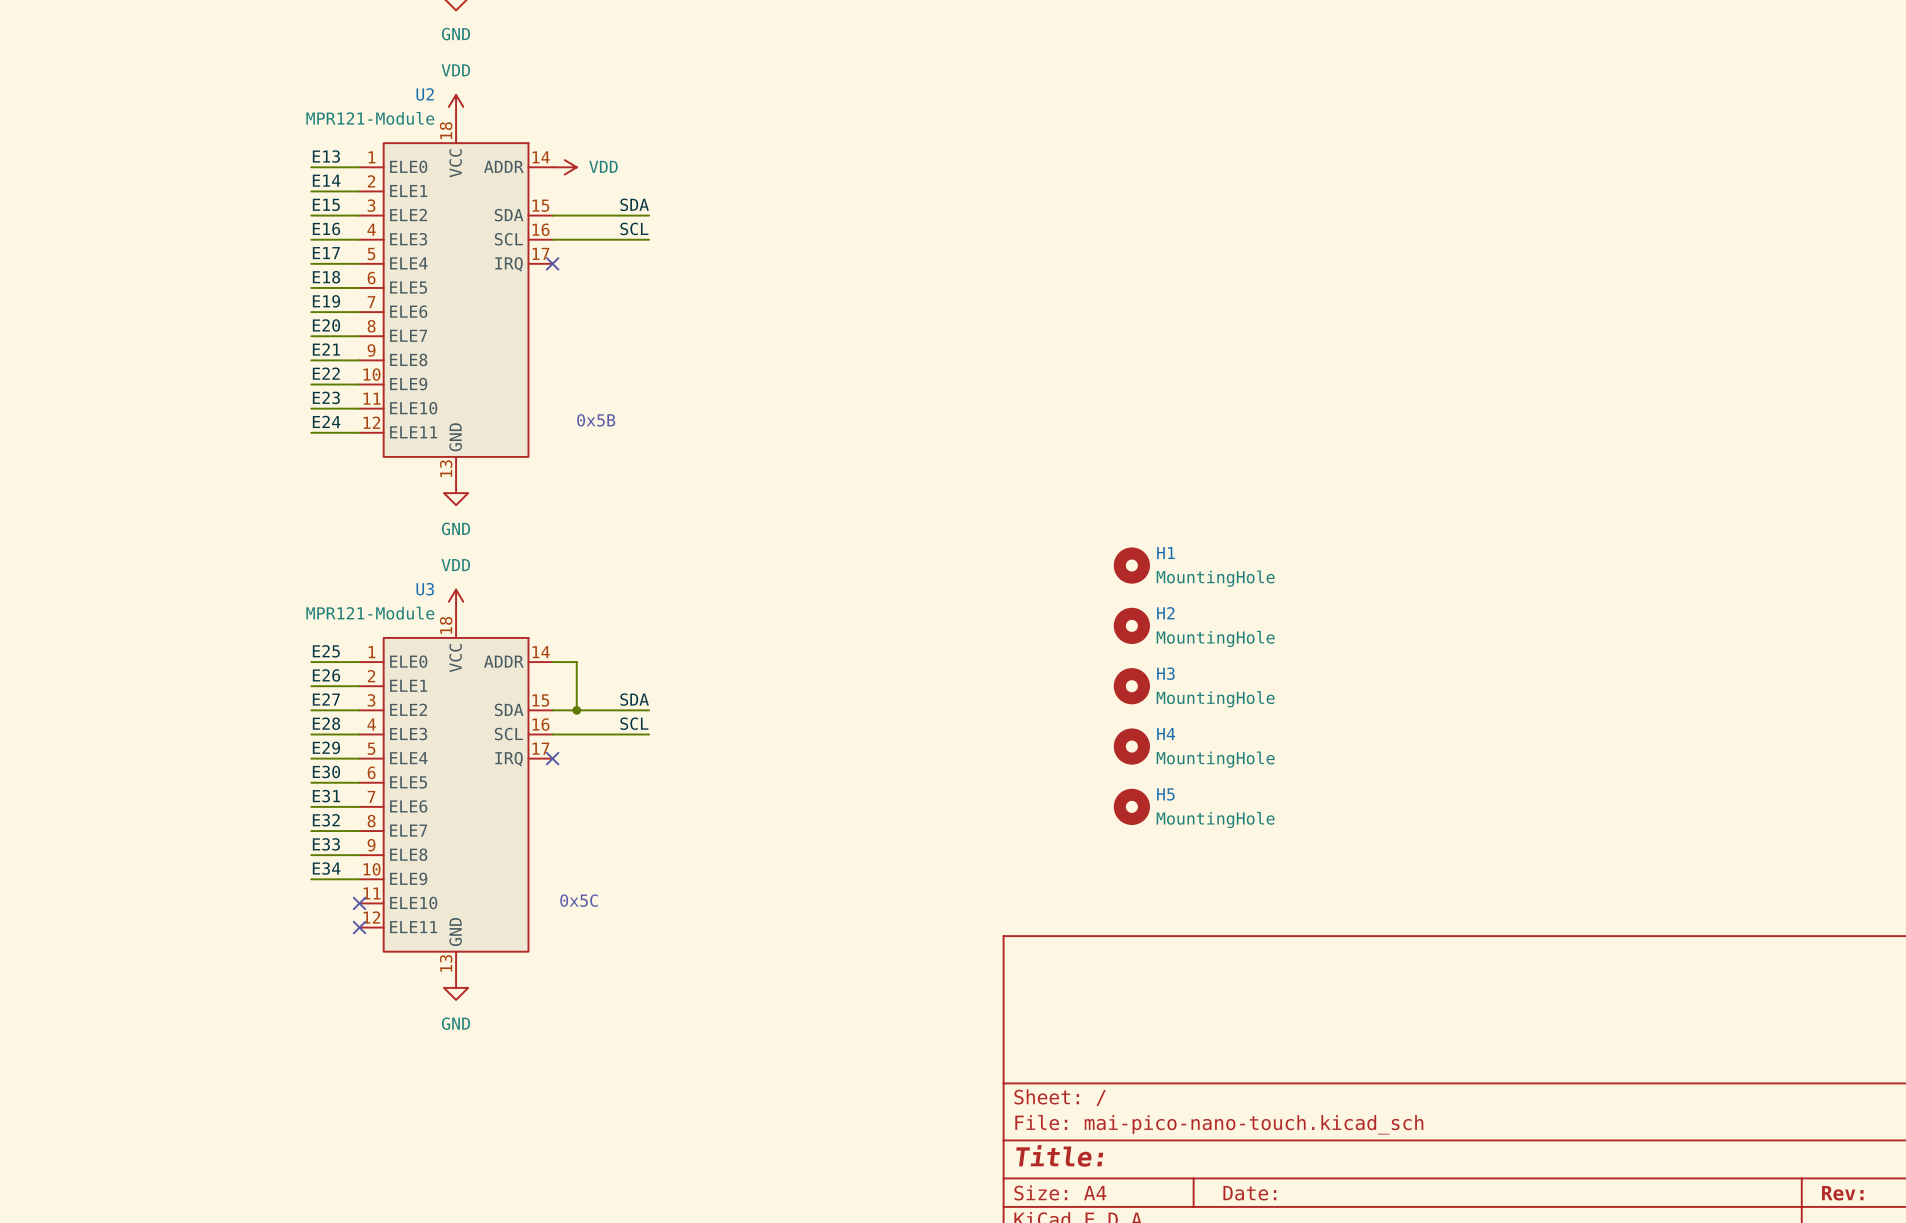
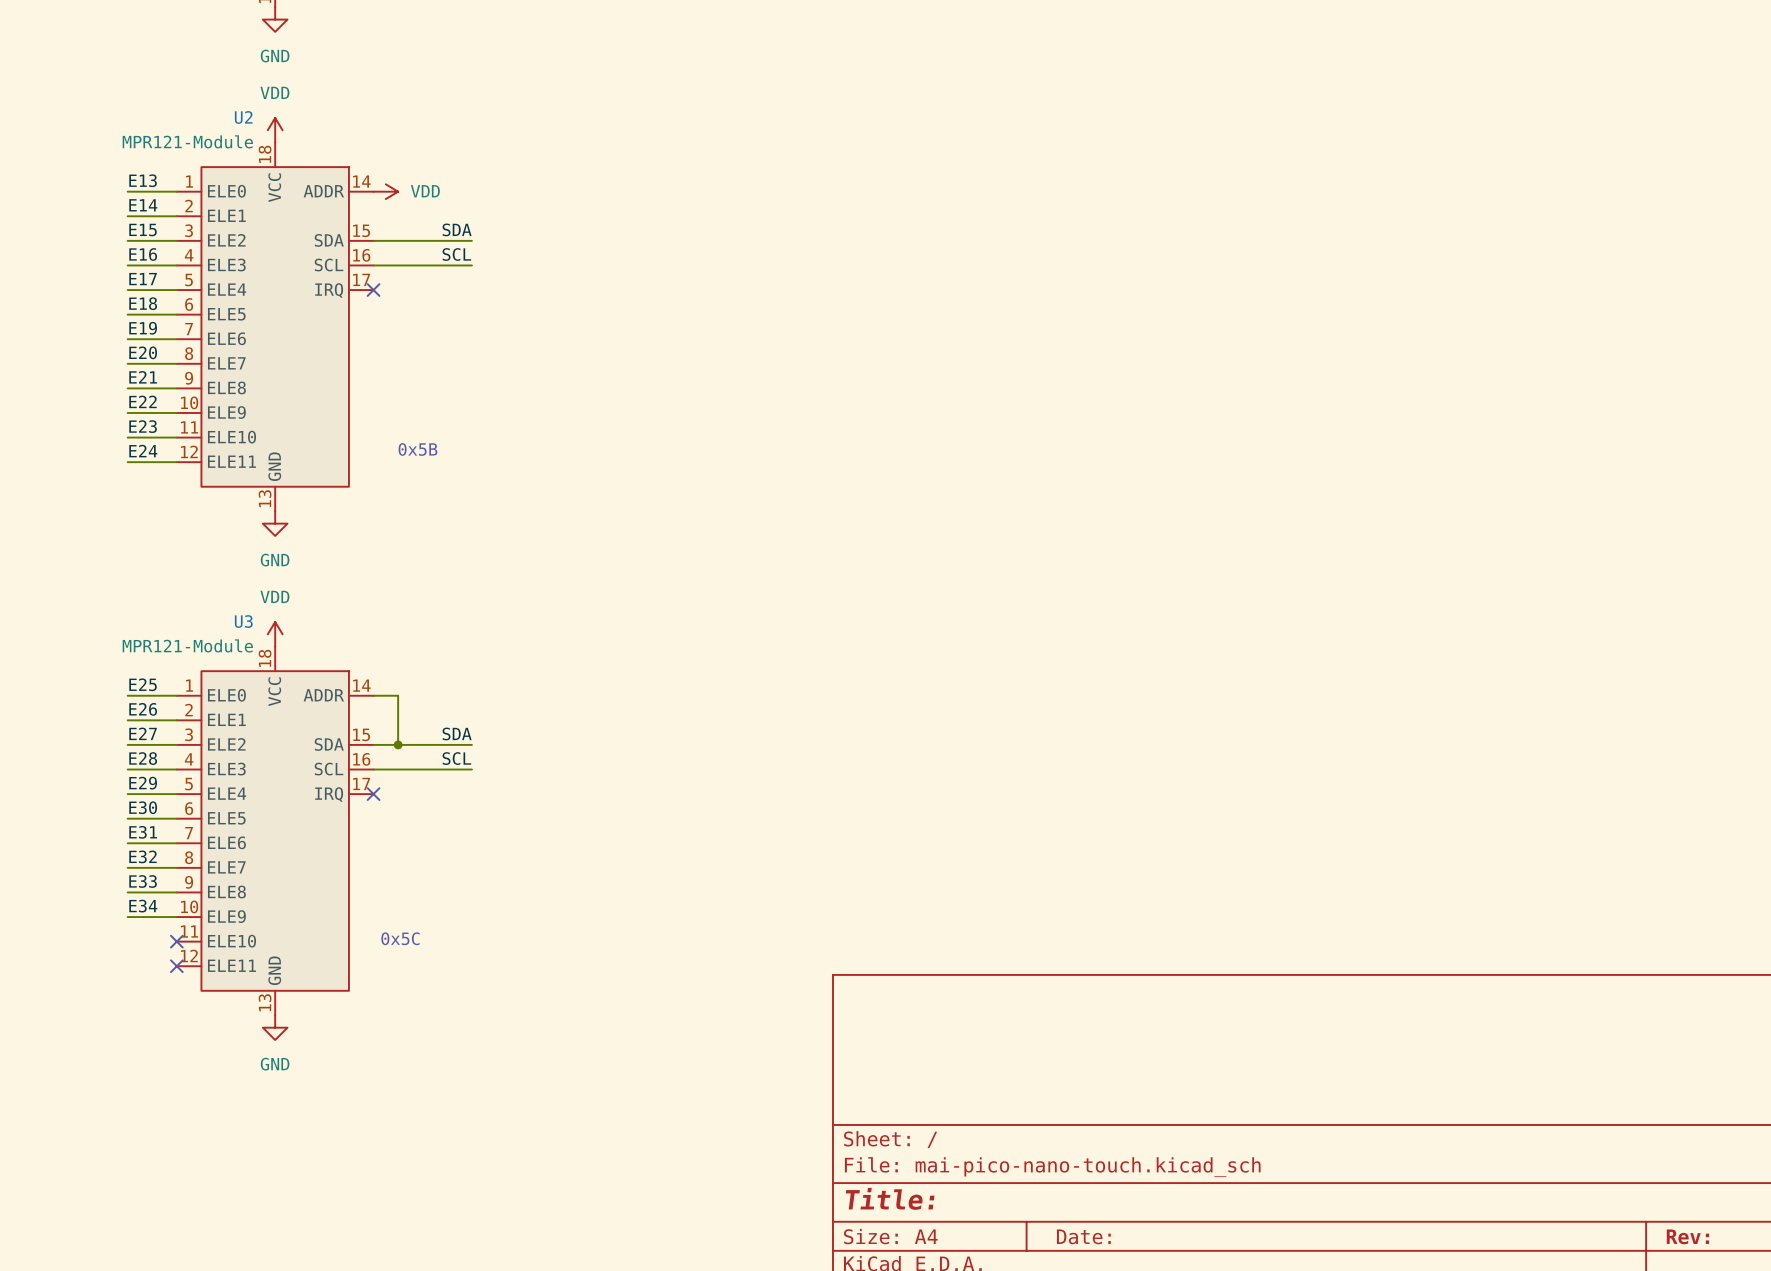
H1: MountingHole (1131, 565) -> none
H2: MountingHole (1131, 625) -> none
H3: MountingHole (1131, 686) -> none
H4: MountingHole (1131, 746) -> none
H5: MountingHole (1131, 806) -> none

